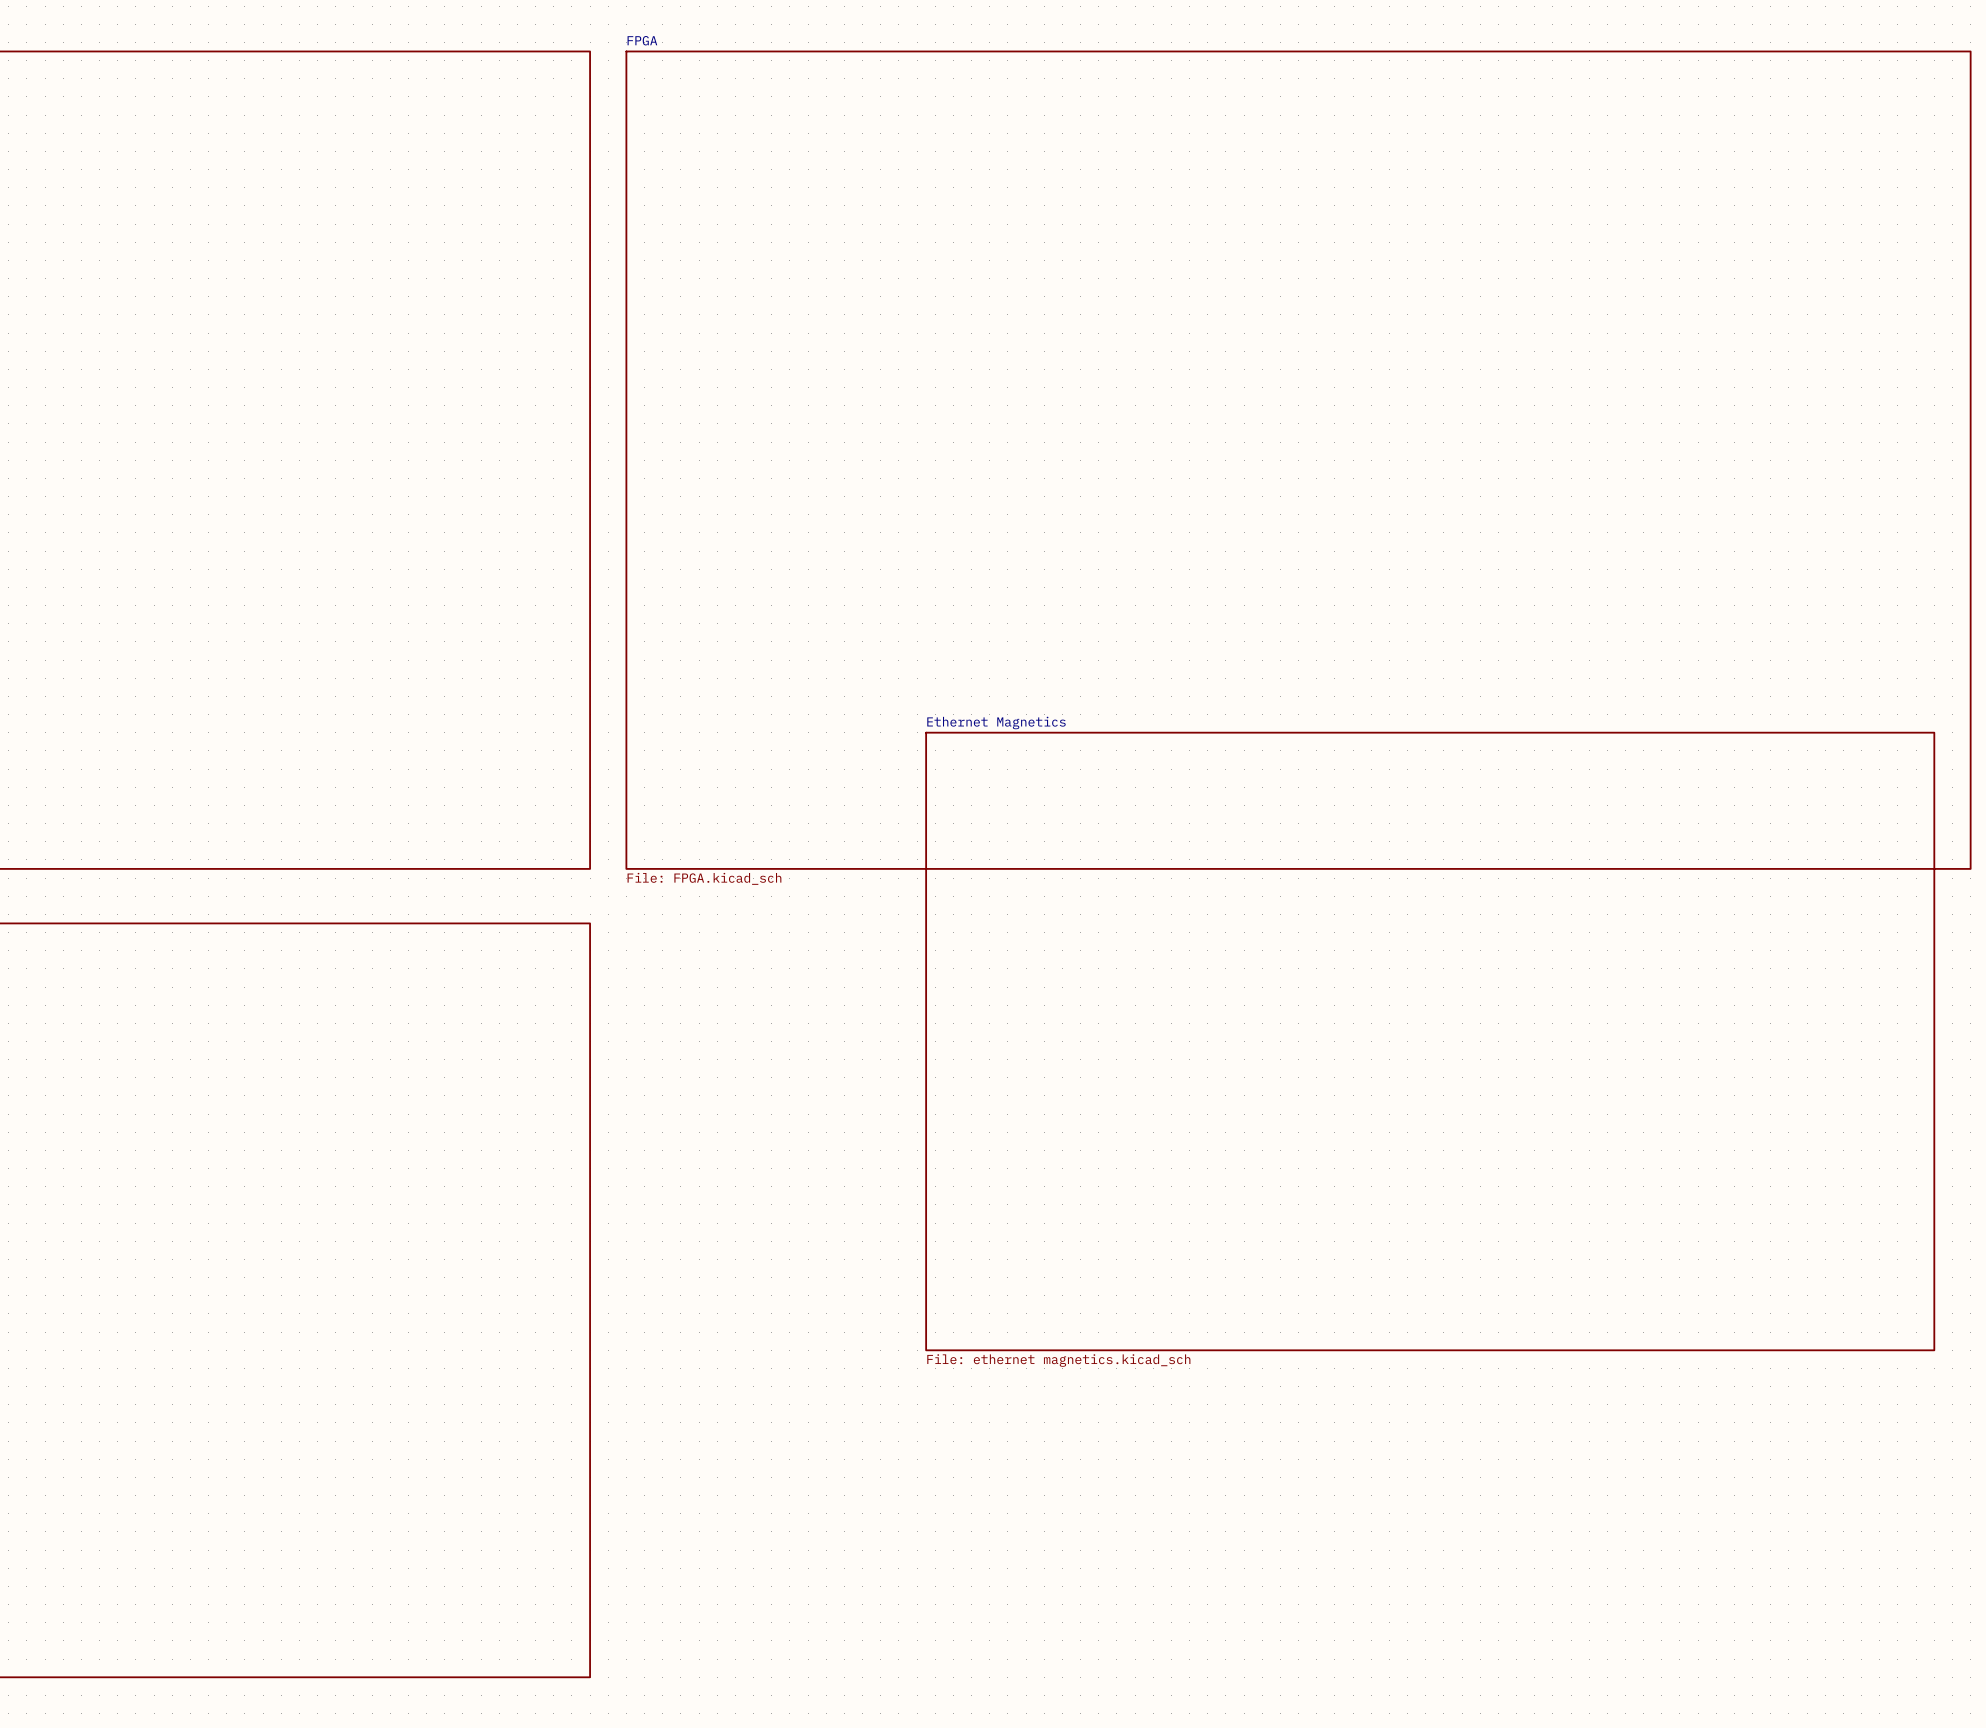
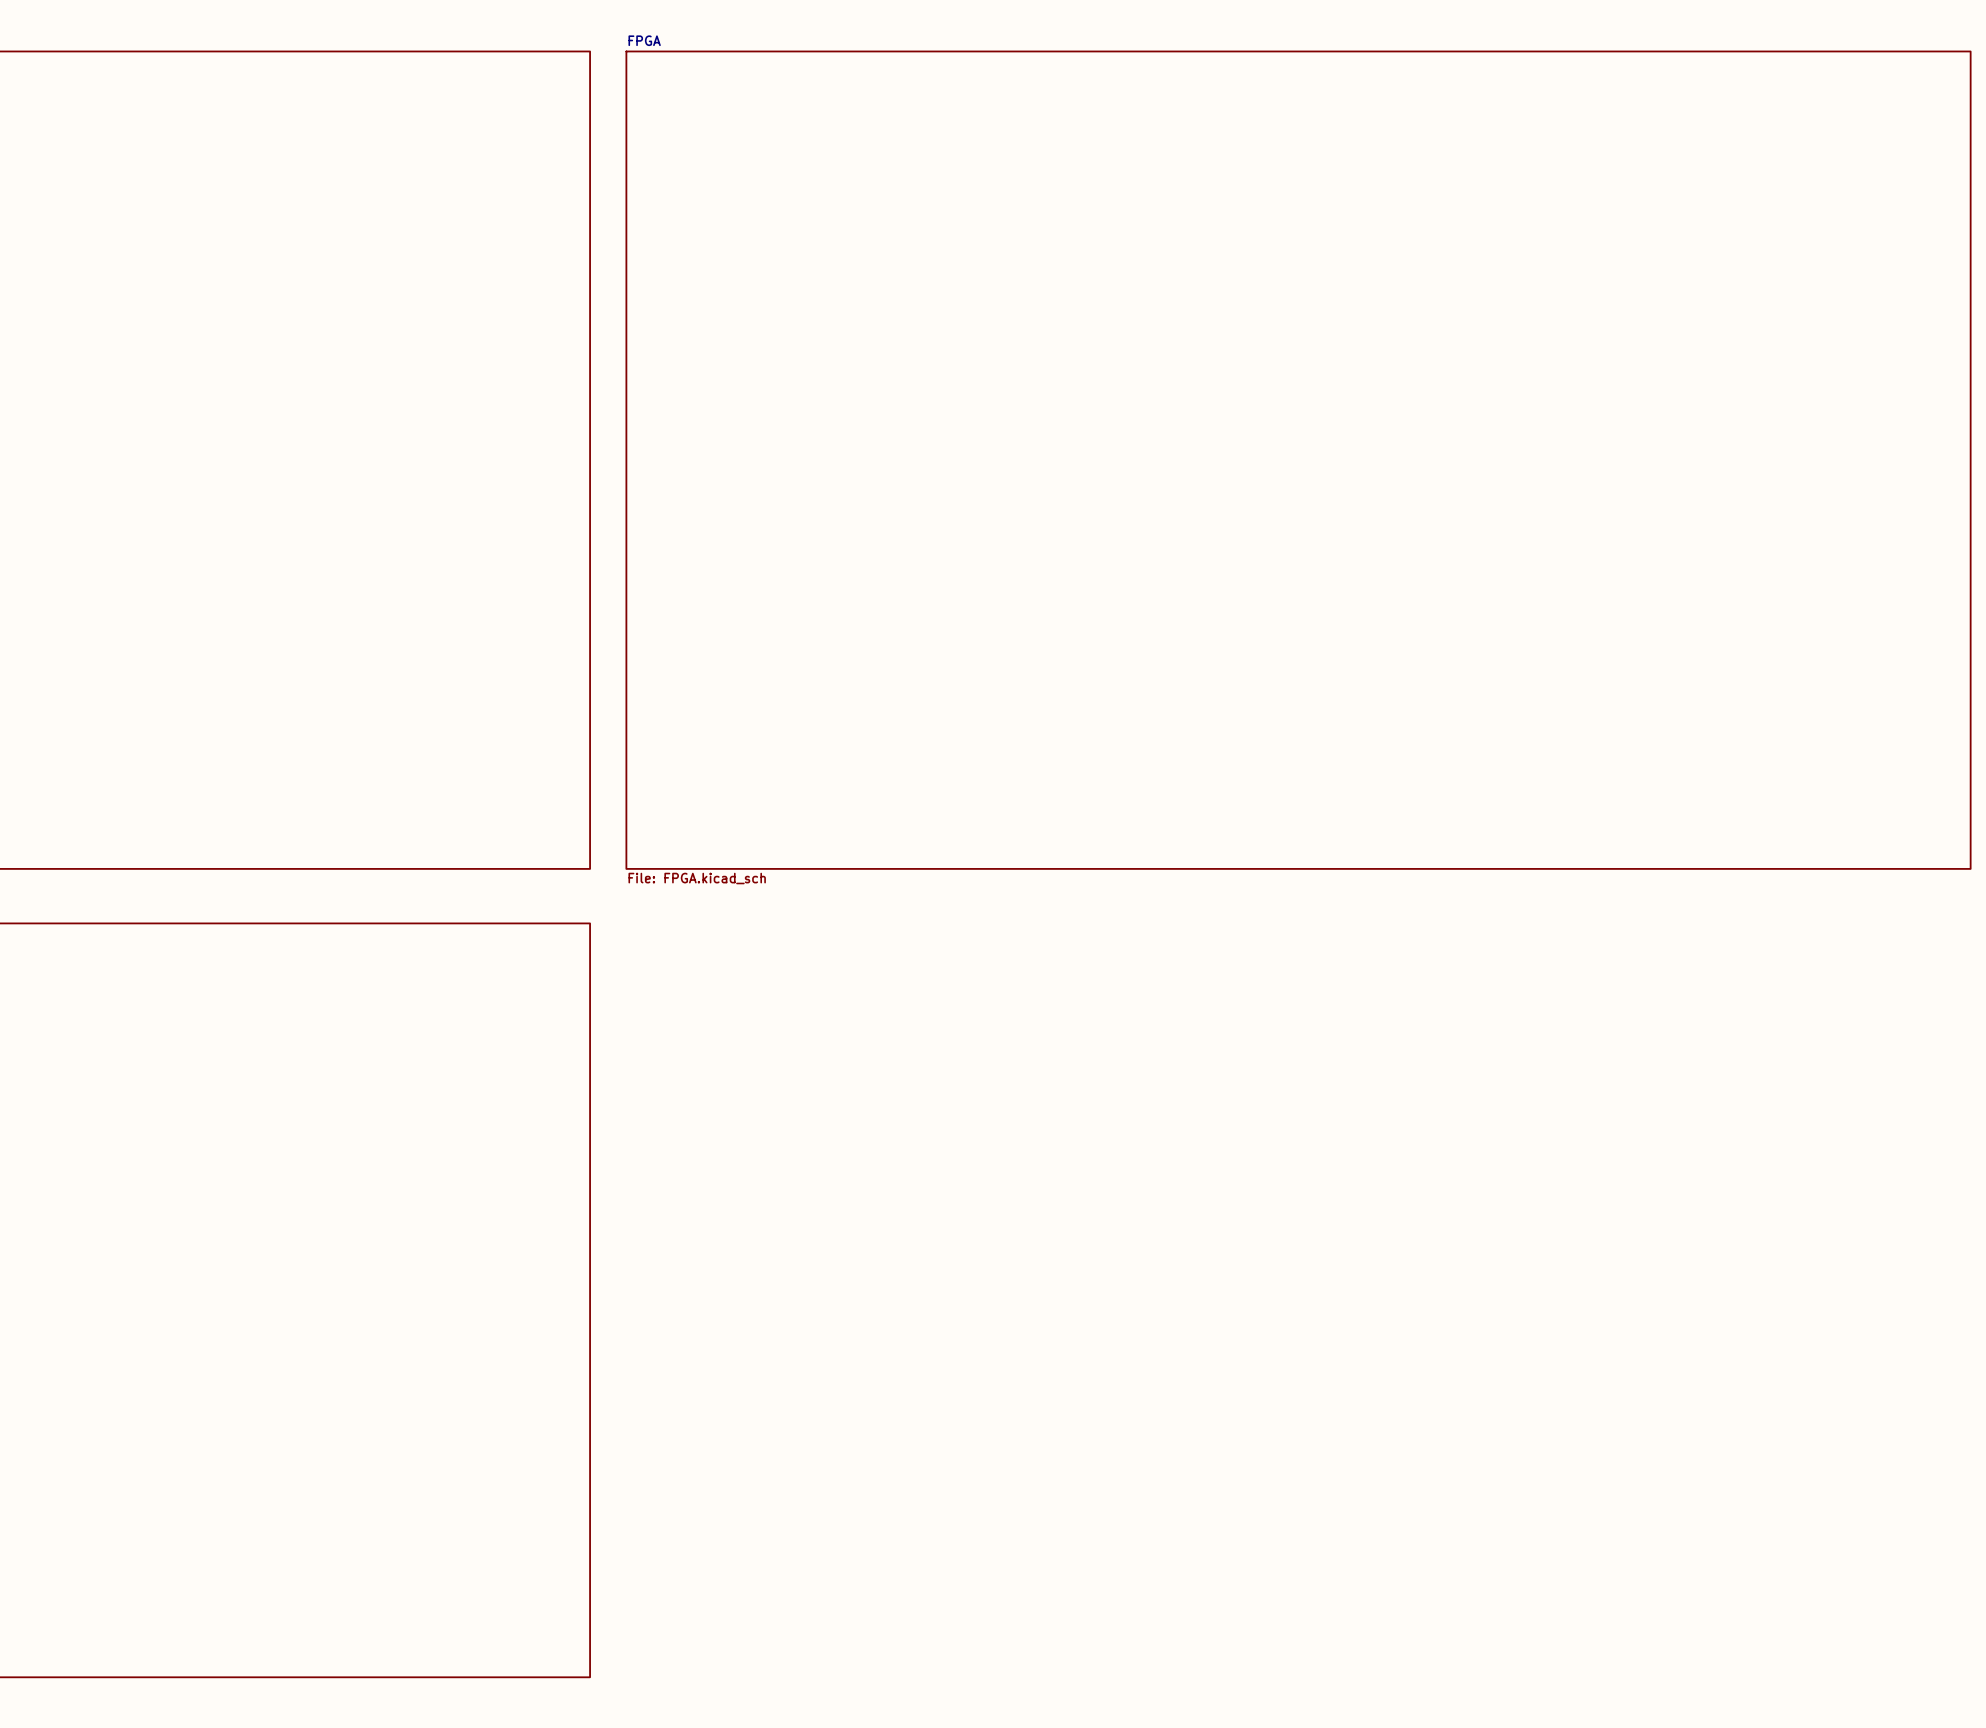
sheet Ethernet Magnetics: File: ethernet magnetics.kicad_sch (1430, 1041) -> none

